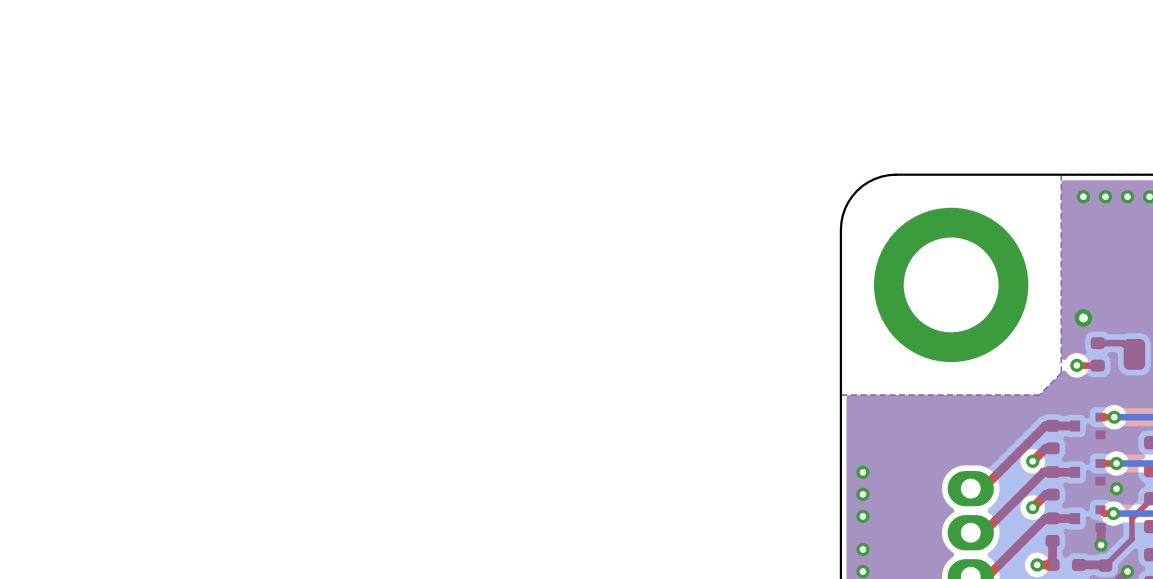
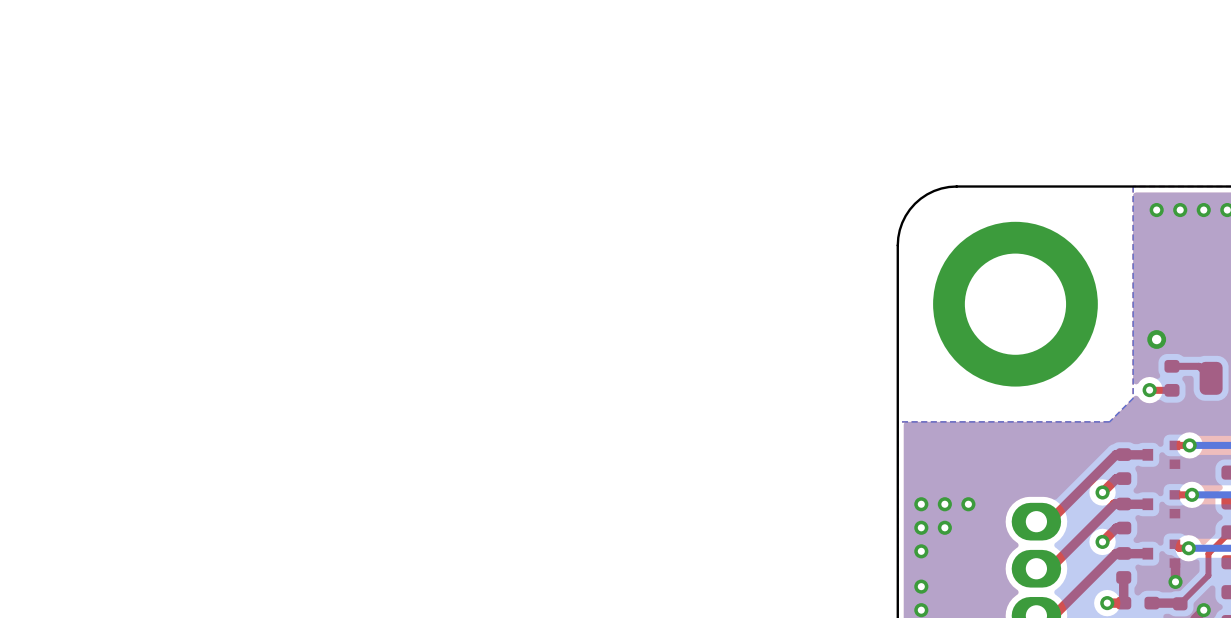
via: none -> (944, 504)
via: none -> (968, 504)
via: (1116, 488) -> none
via: none -> (944, 527)

